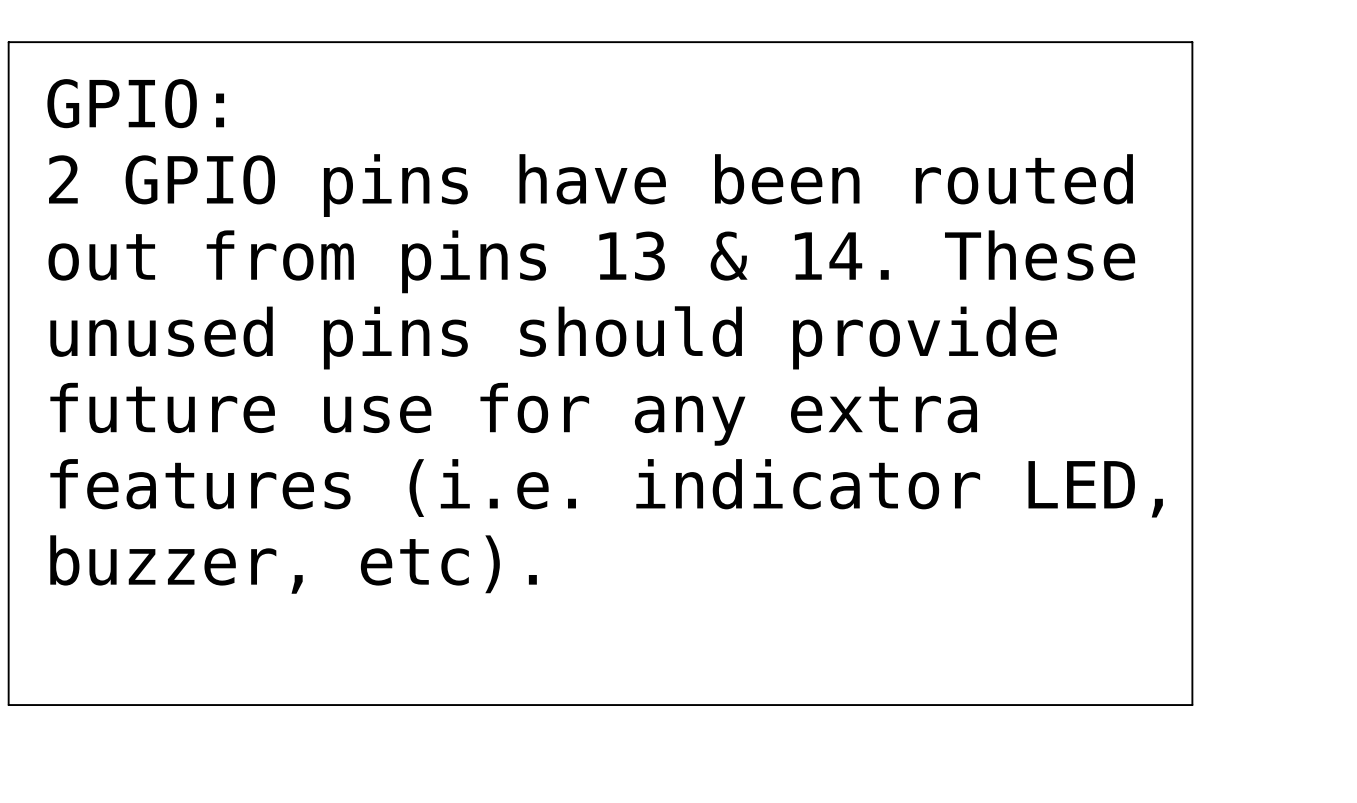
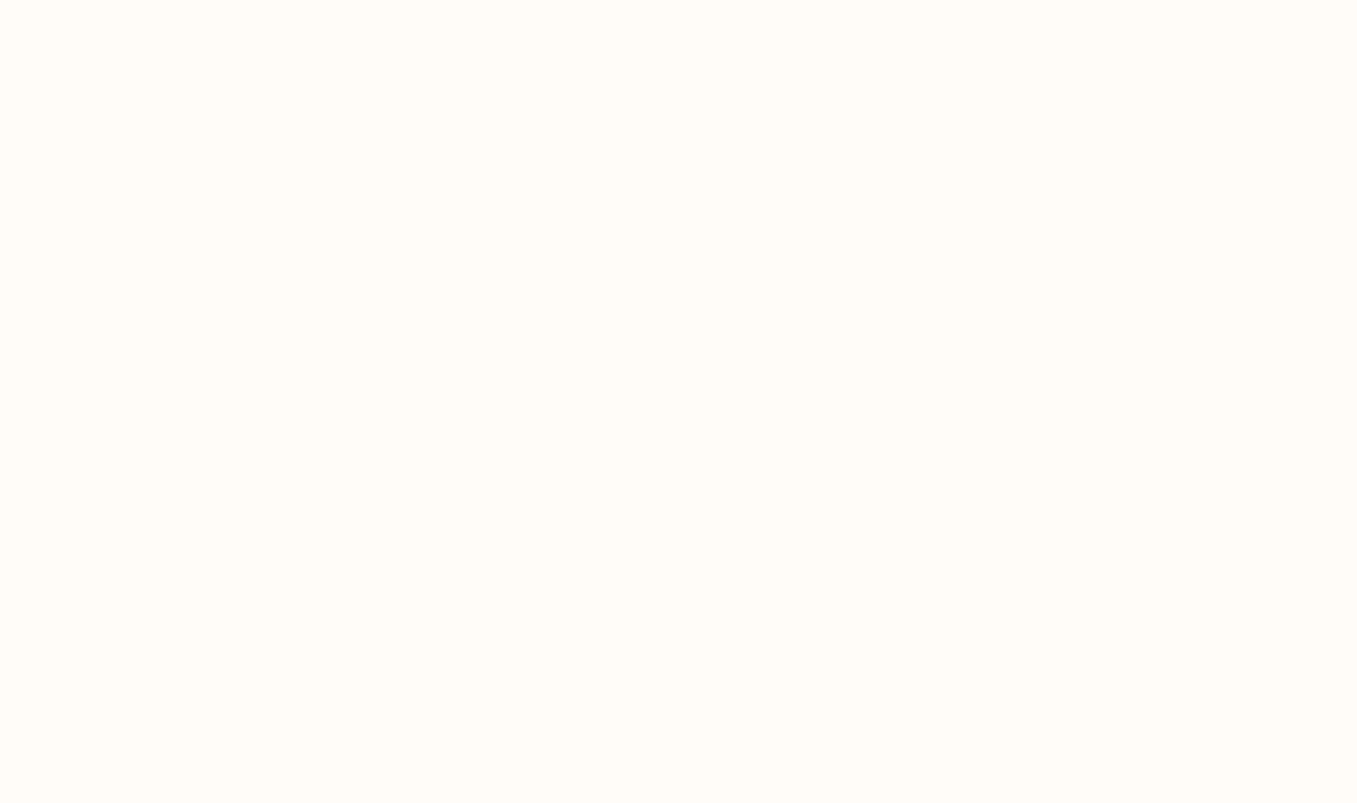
line: (8, 42) (1192, 42) (1192, 705) (8, 705) (8, 42) -> none
text: GPIO: (135, 103) -> none
text: 2 GPIO pins have been routed (590, 185) -> none
text: out from pins 13 & 14. These (591, 261) -> none
text: unused pins should provide (553, 337) -> none
text: future use for any extra (513, 414) -> none
text: features (i.e. indicator LED, (606, 488) -> none
text: buzzer, etc). (293, 564) -> none

